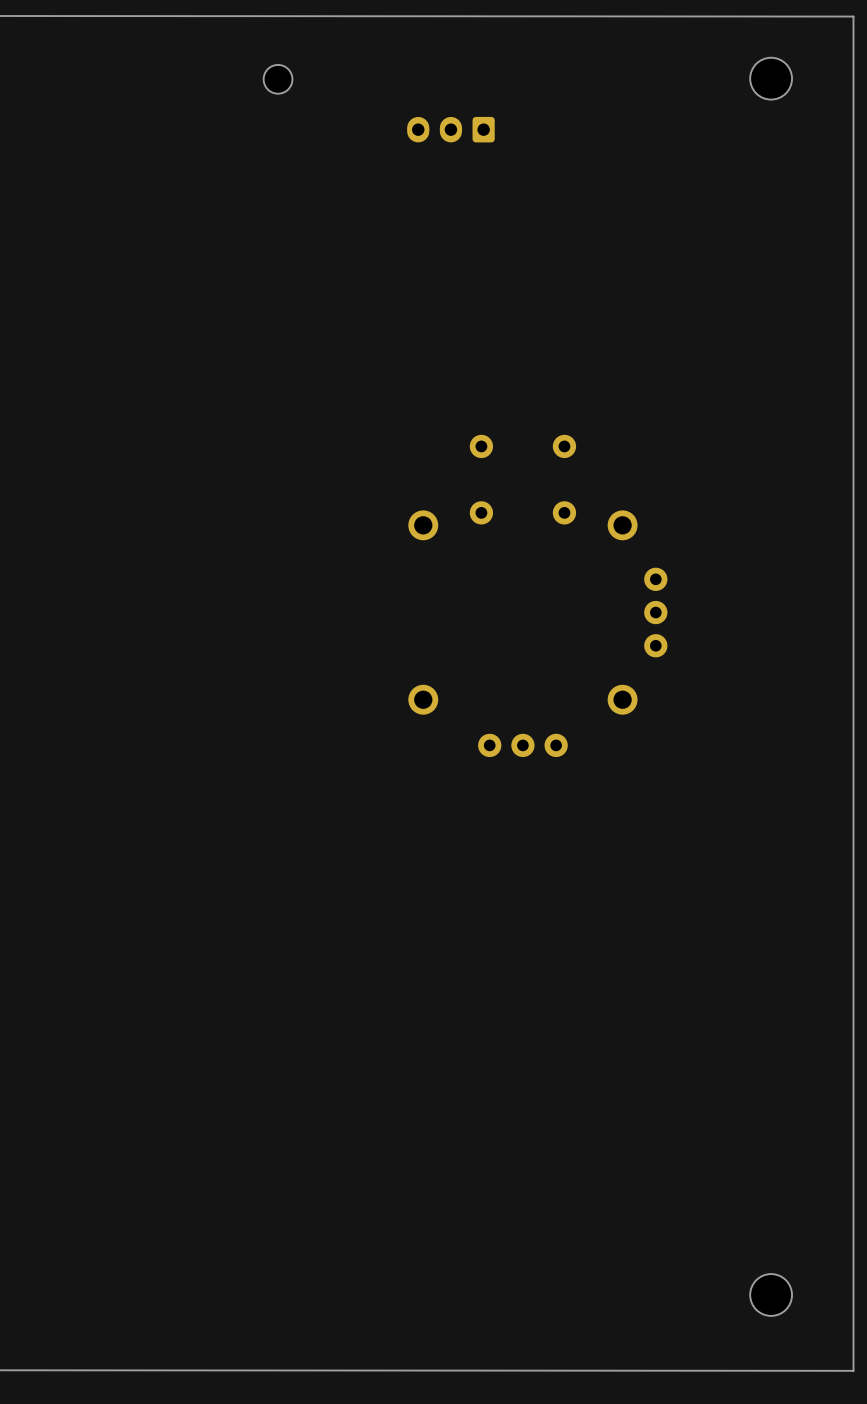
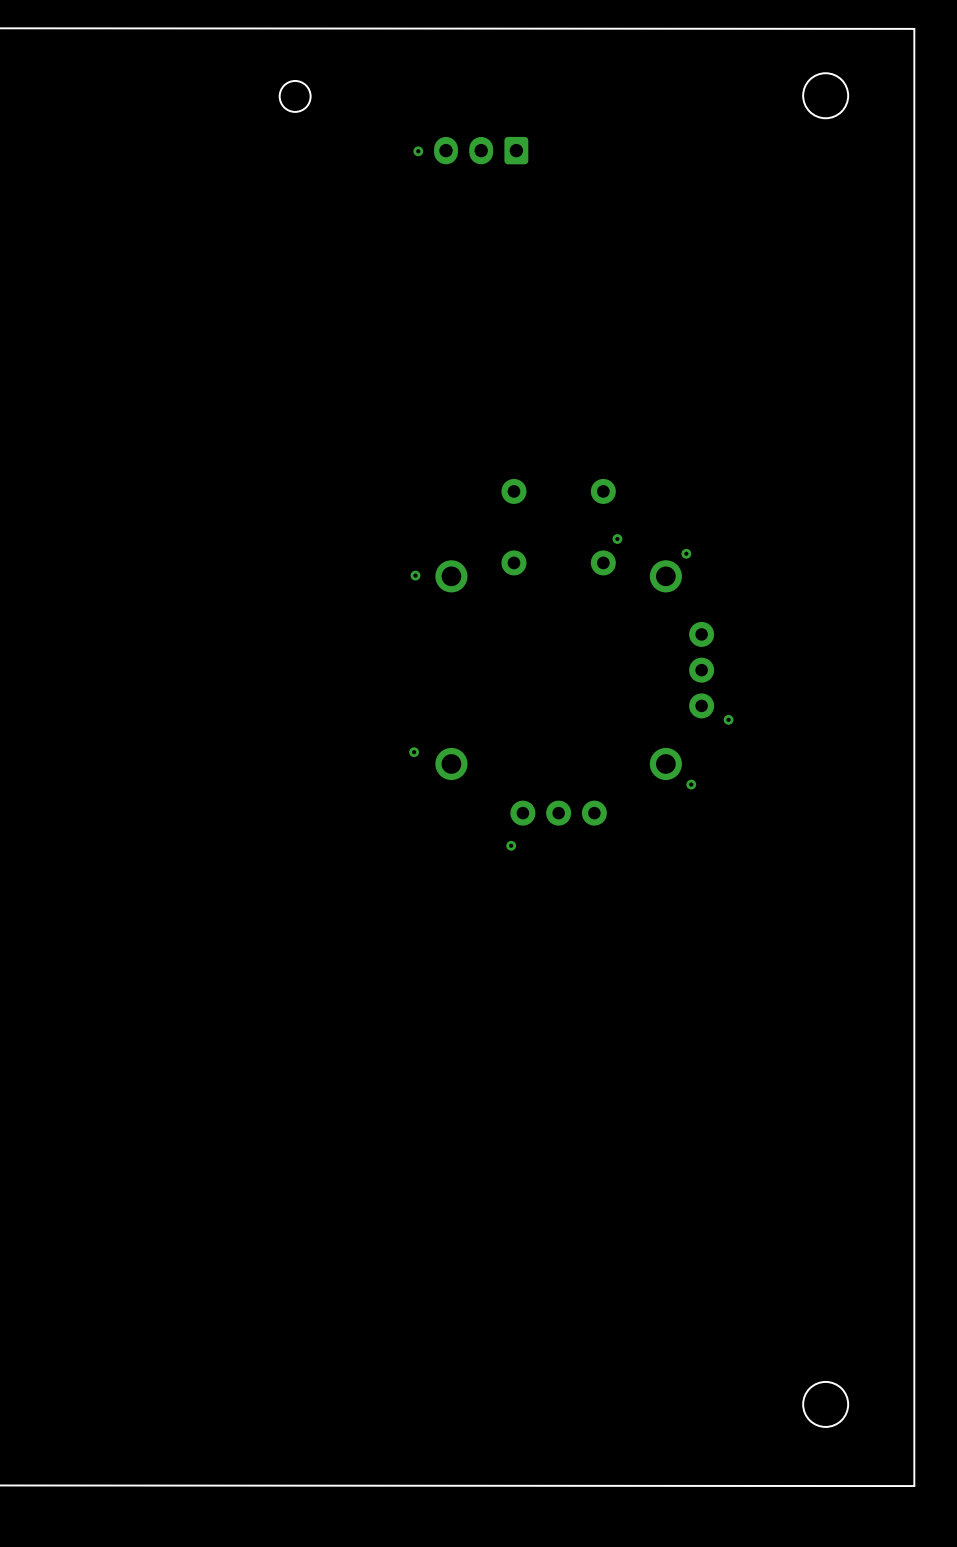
via: none -> (418, 151)
via: none -> (617, 539)
via: none -> (686, 553)
via: none -> (415, 575)
via: none -> (728, 719)
via: none -> (414, 752)
via: none -> (691, 784)
via: none -> (511, 845)

